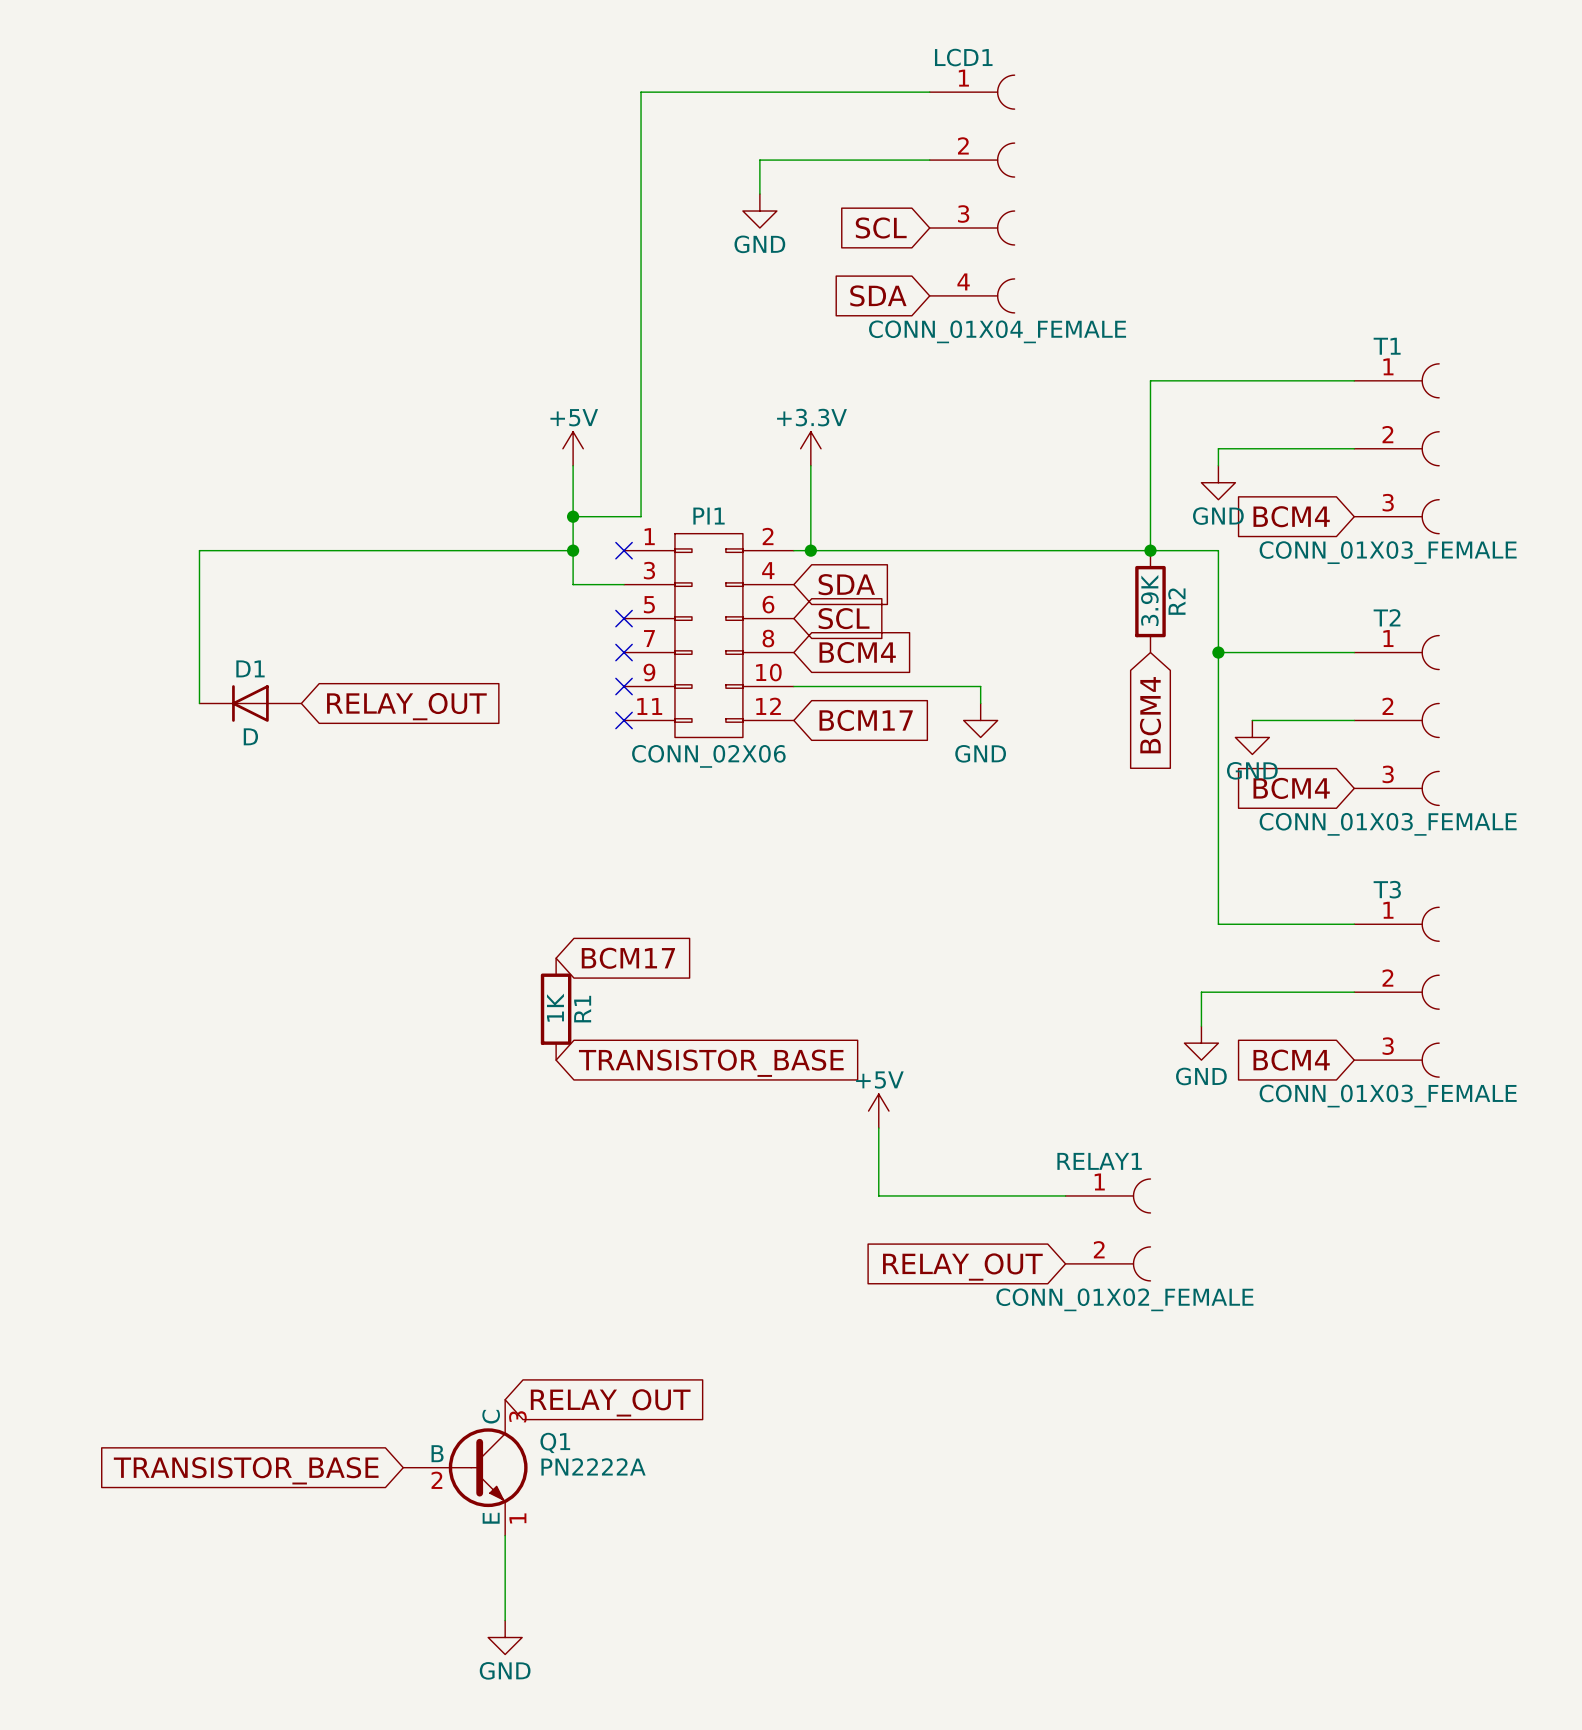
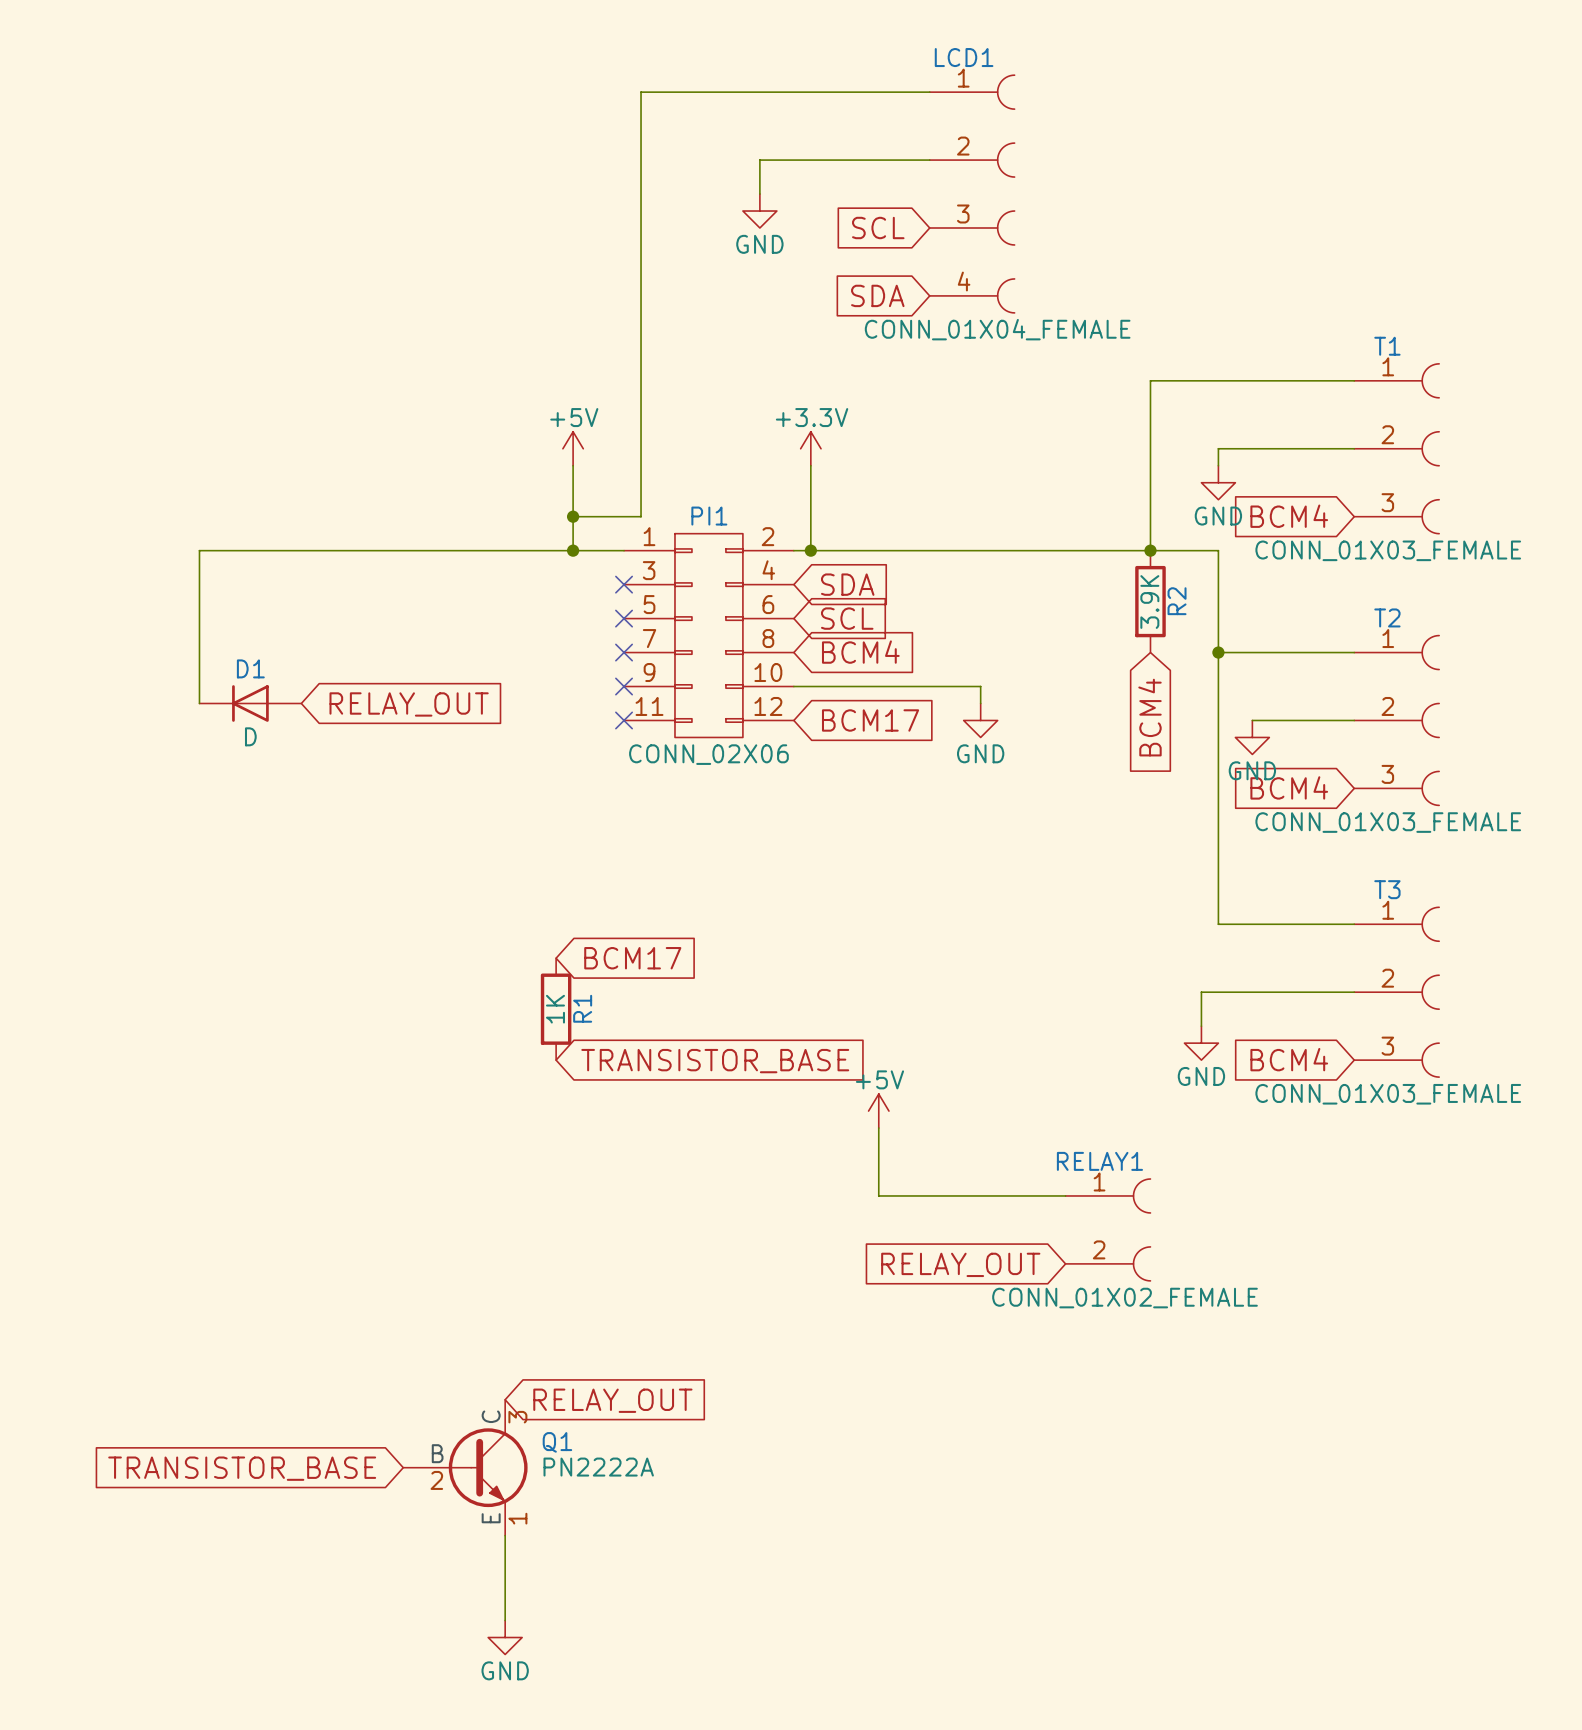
wire: (573, 550) (573, 584) (624, 584) -> (573, 550) (624, 550)
no-connect mark position: (624, 550) -> (624, 584)

